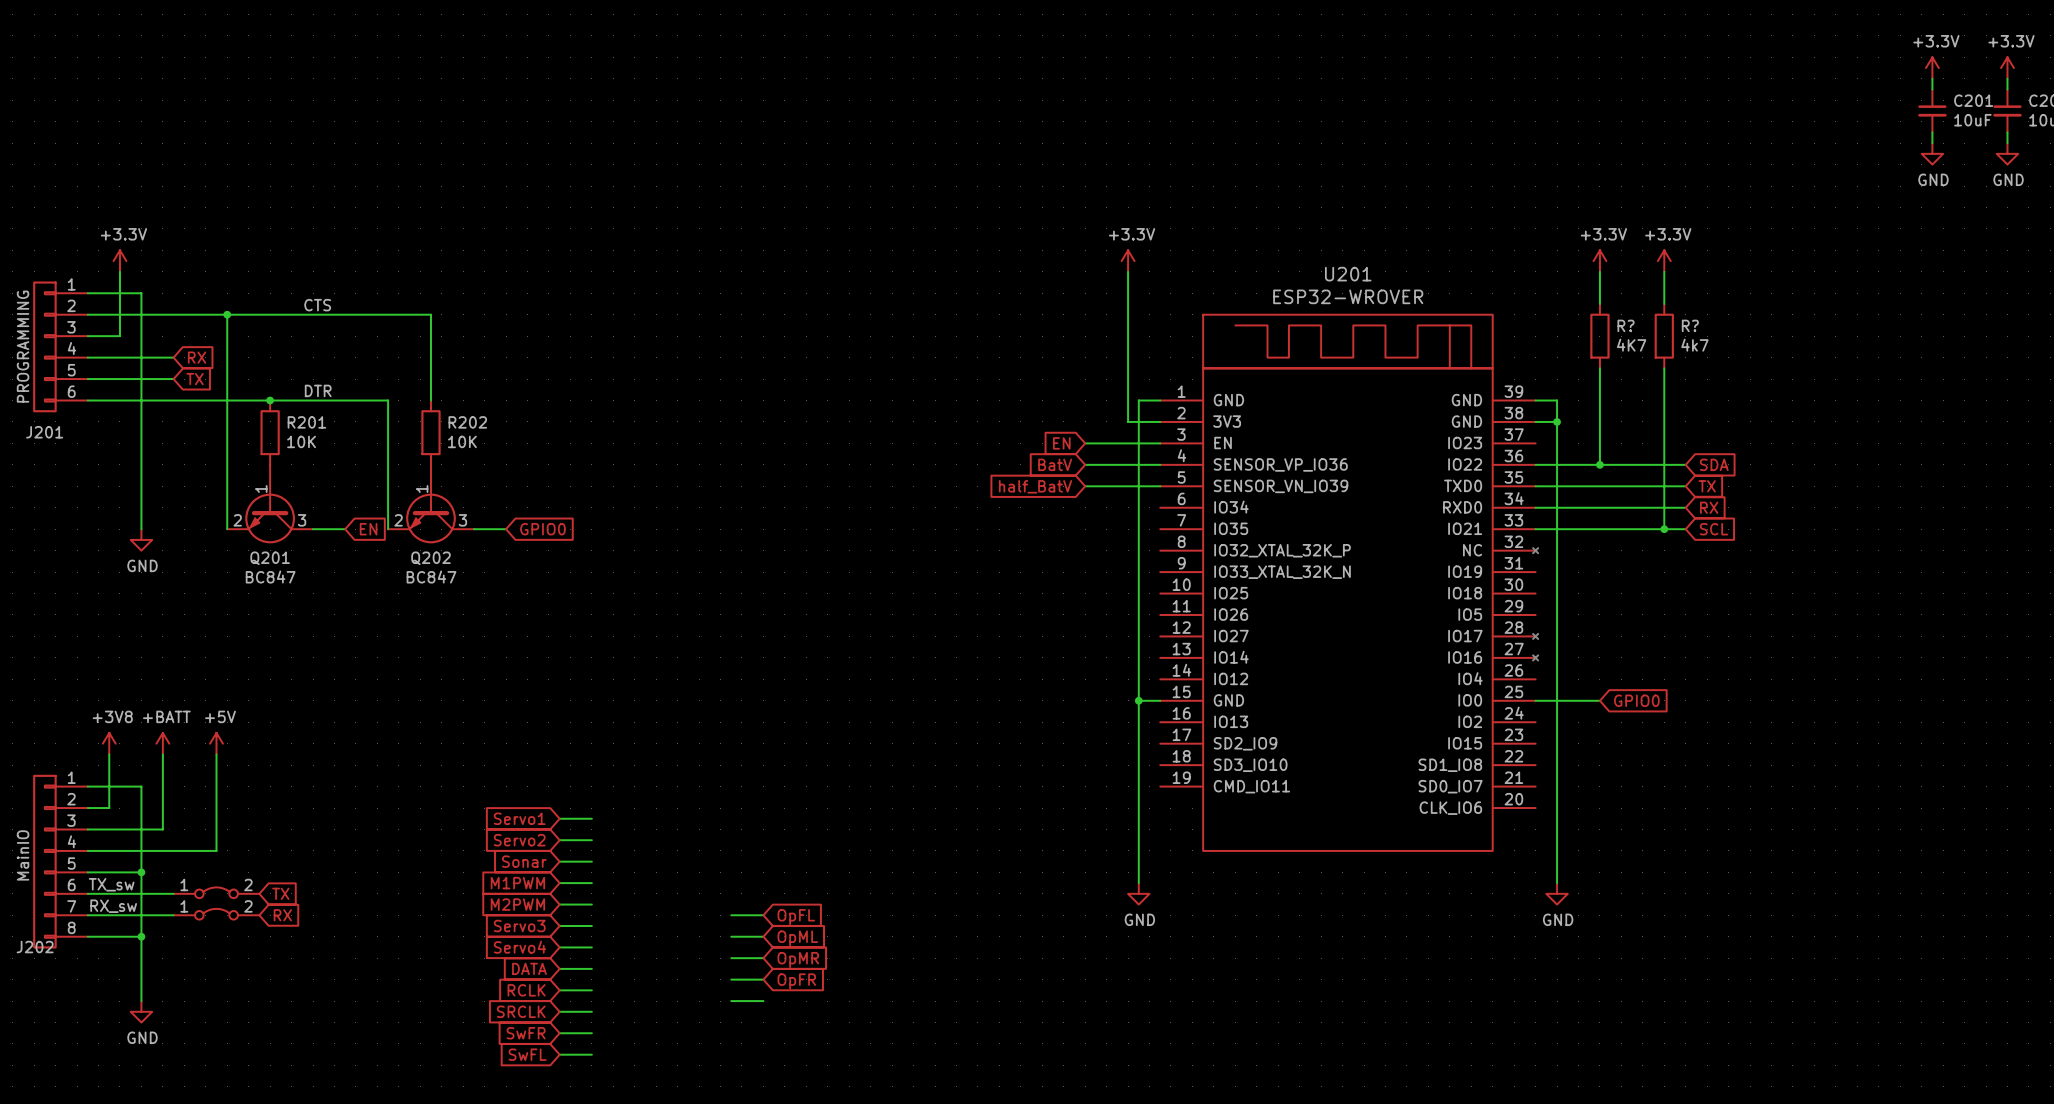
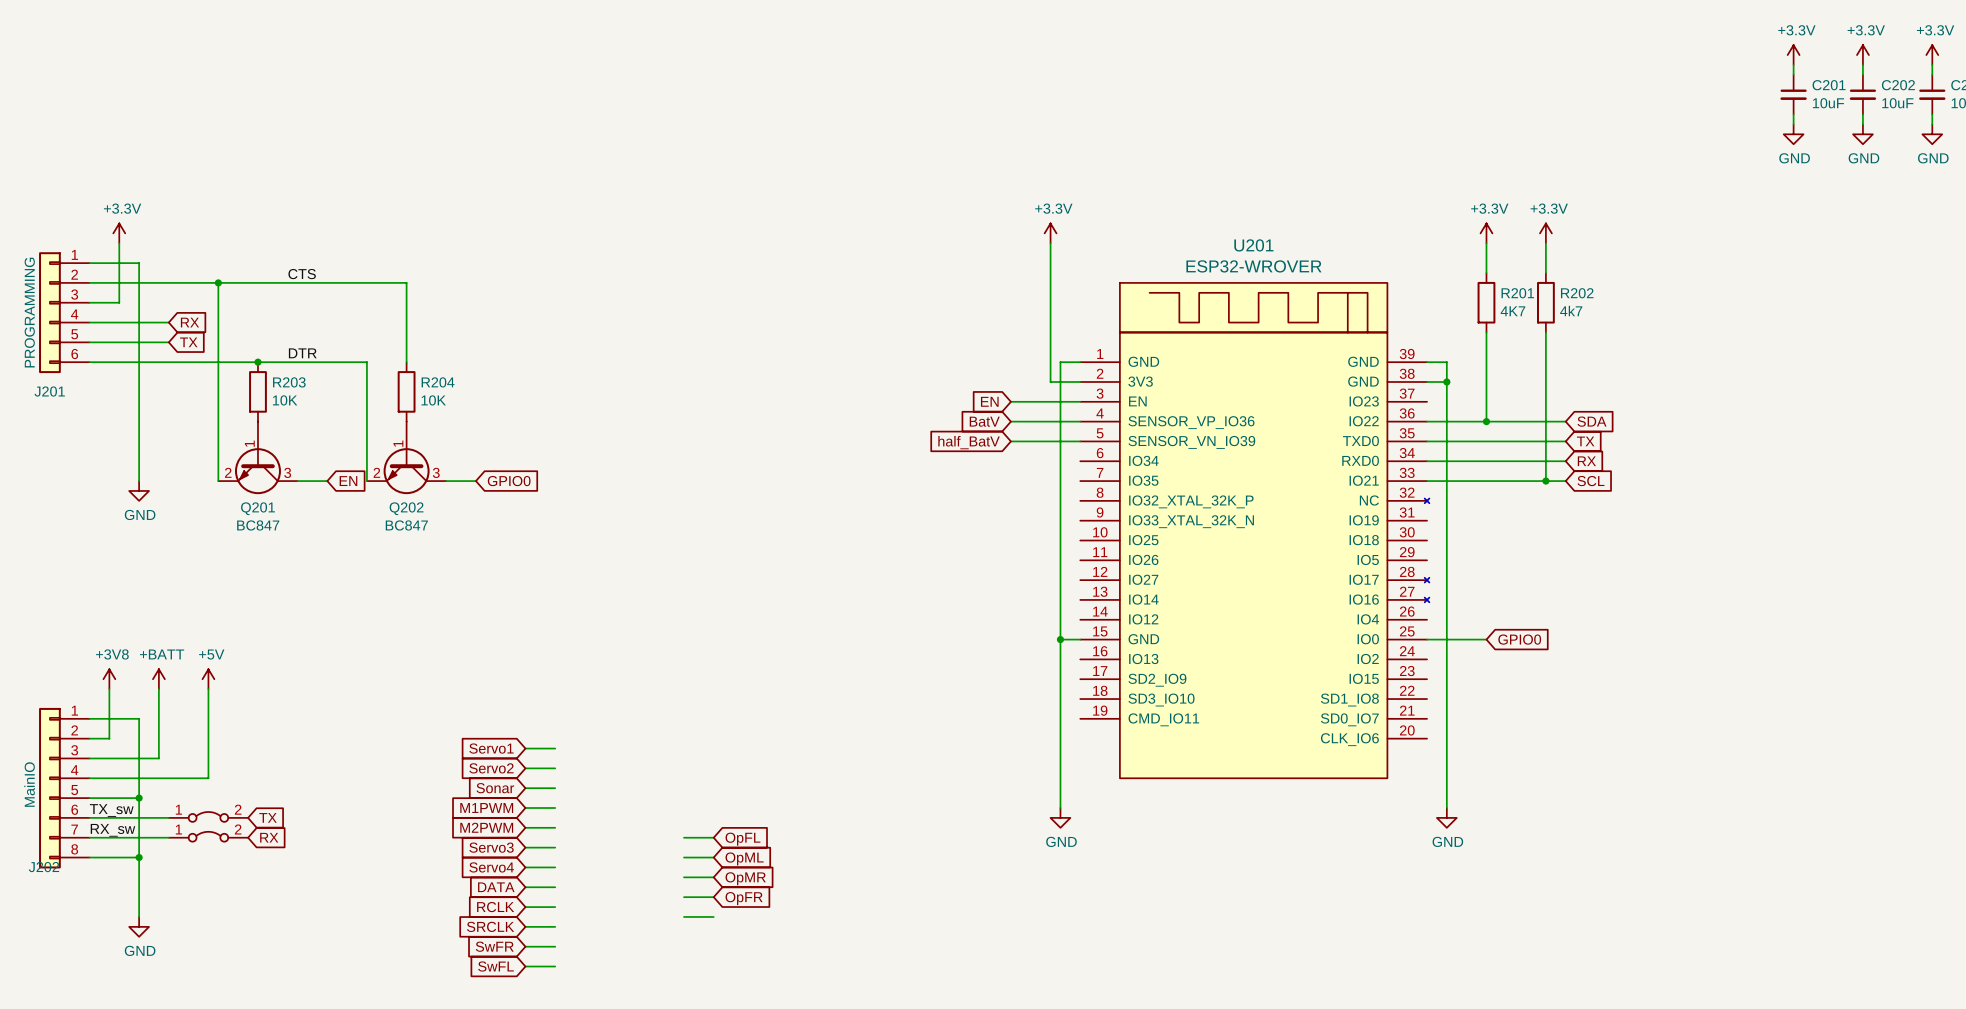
R? name: R? (1626, 325) -> R201 (1517, 293)
R? name: R? (1690, 325) -> R202 (1577, 293)
R201 name: R201 (306, 422) -> R203 (289, 382)
R202 name: R202 (467, 422) -> R204 (438, 382)

